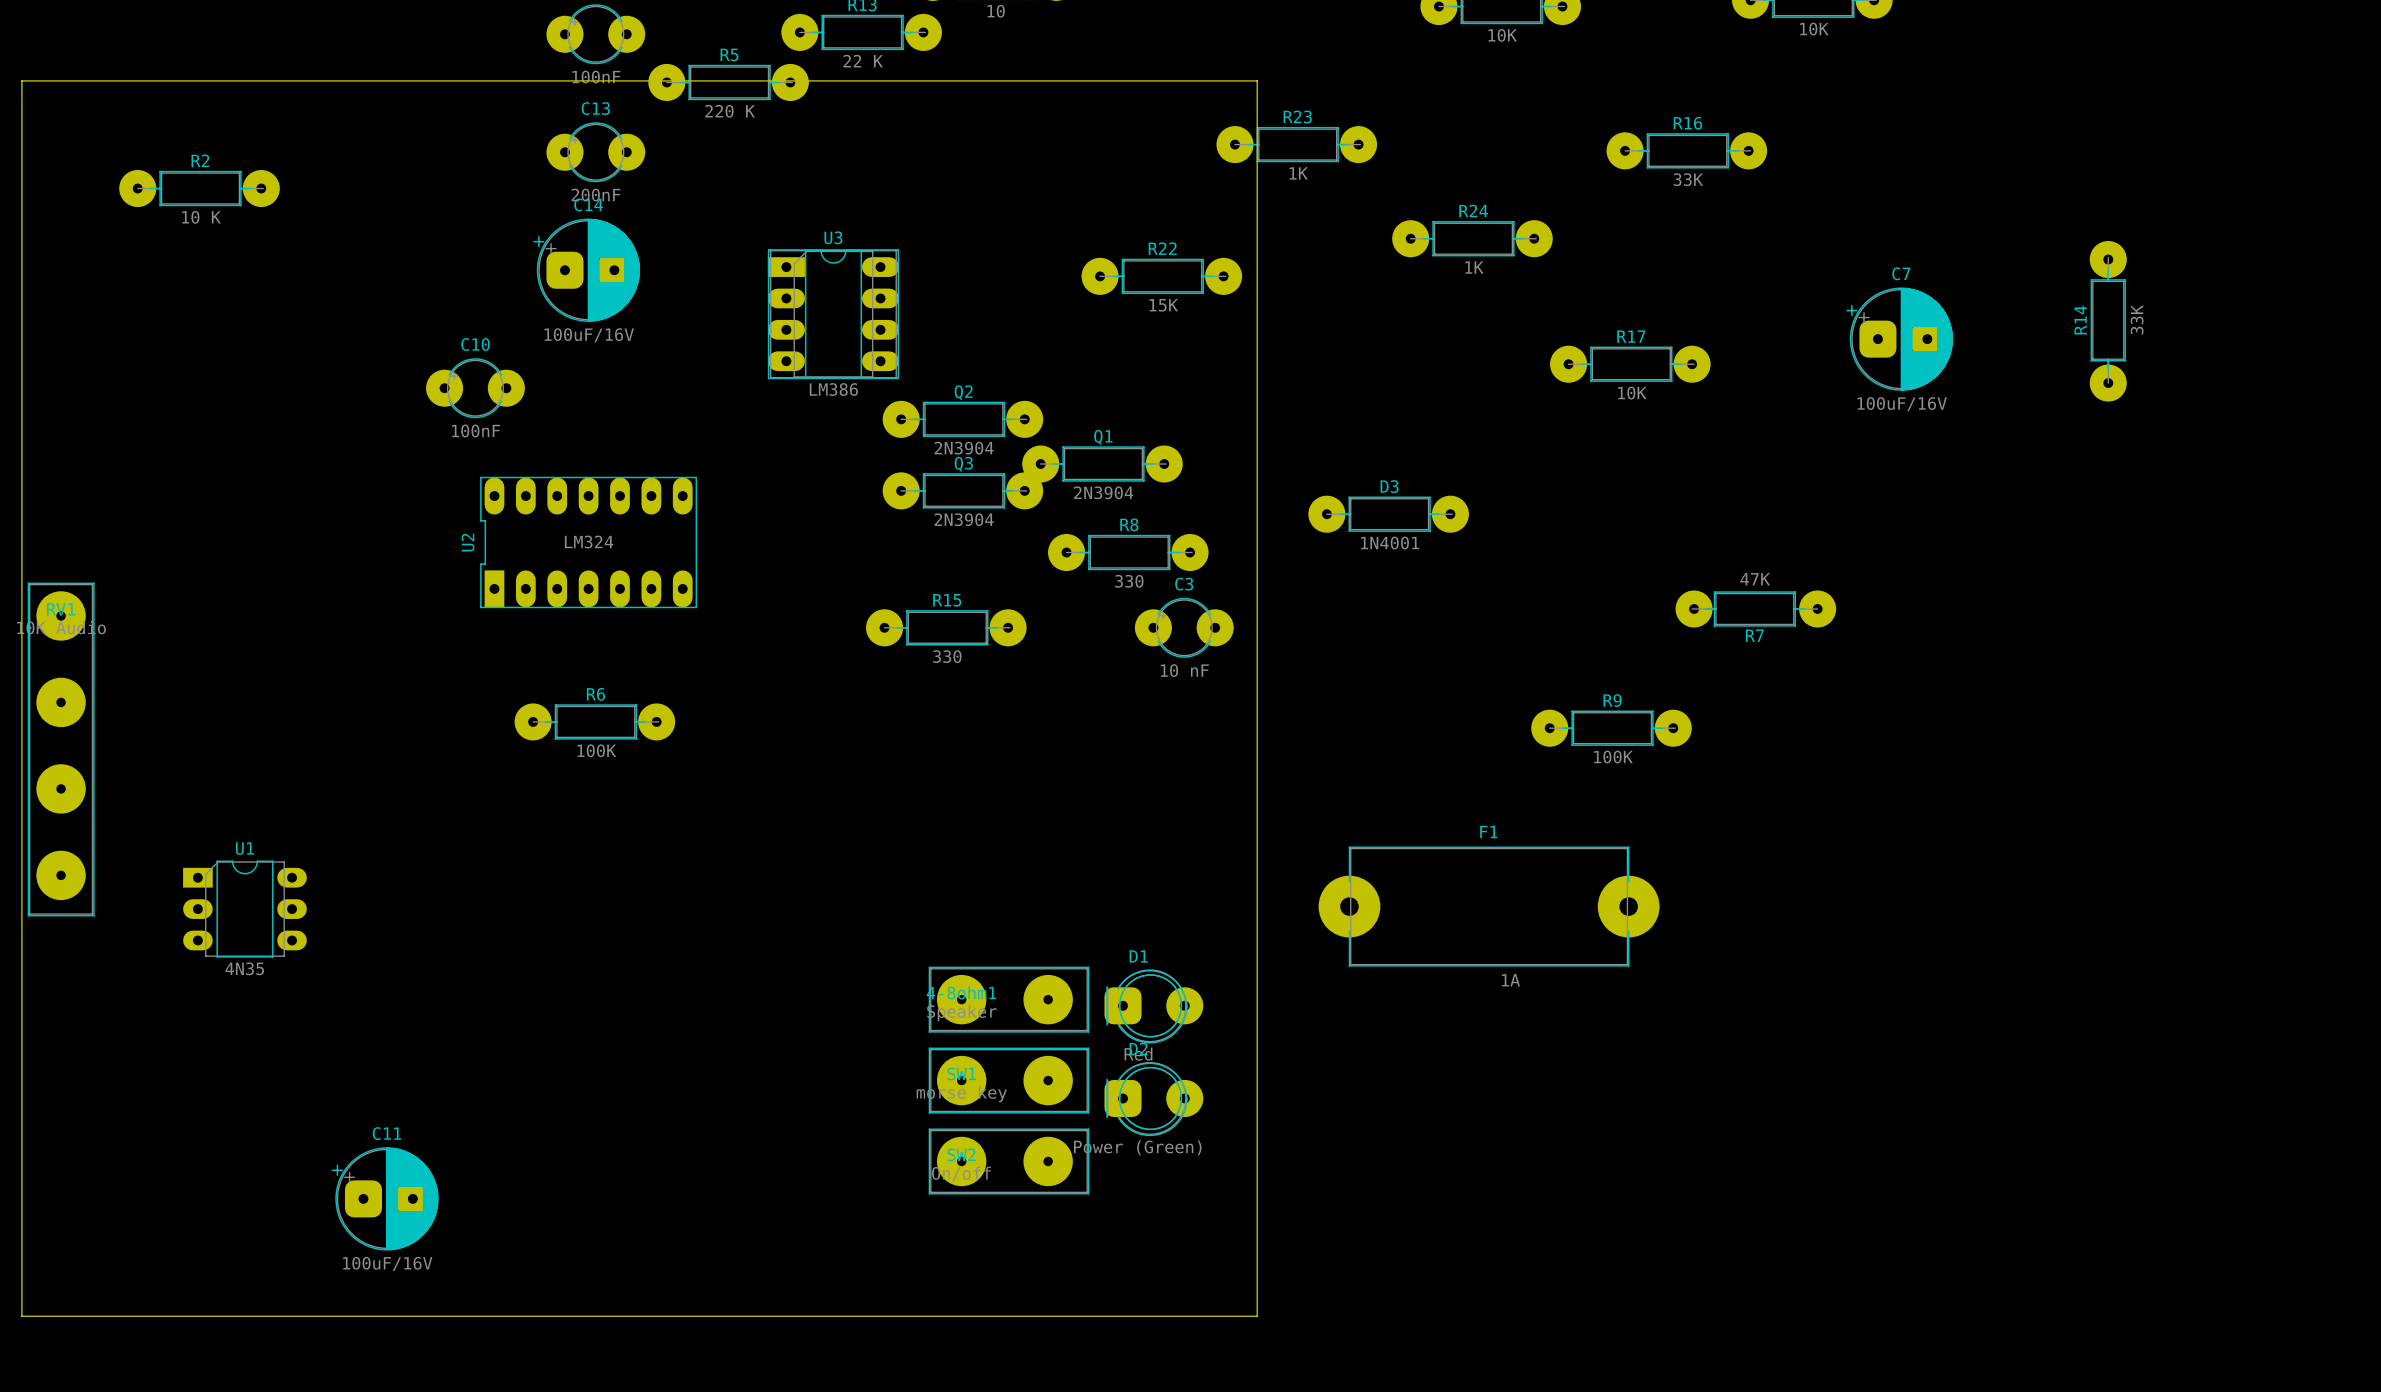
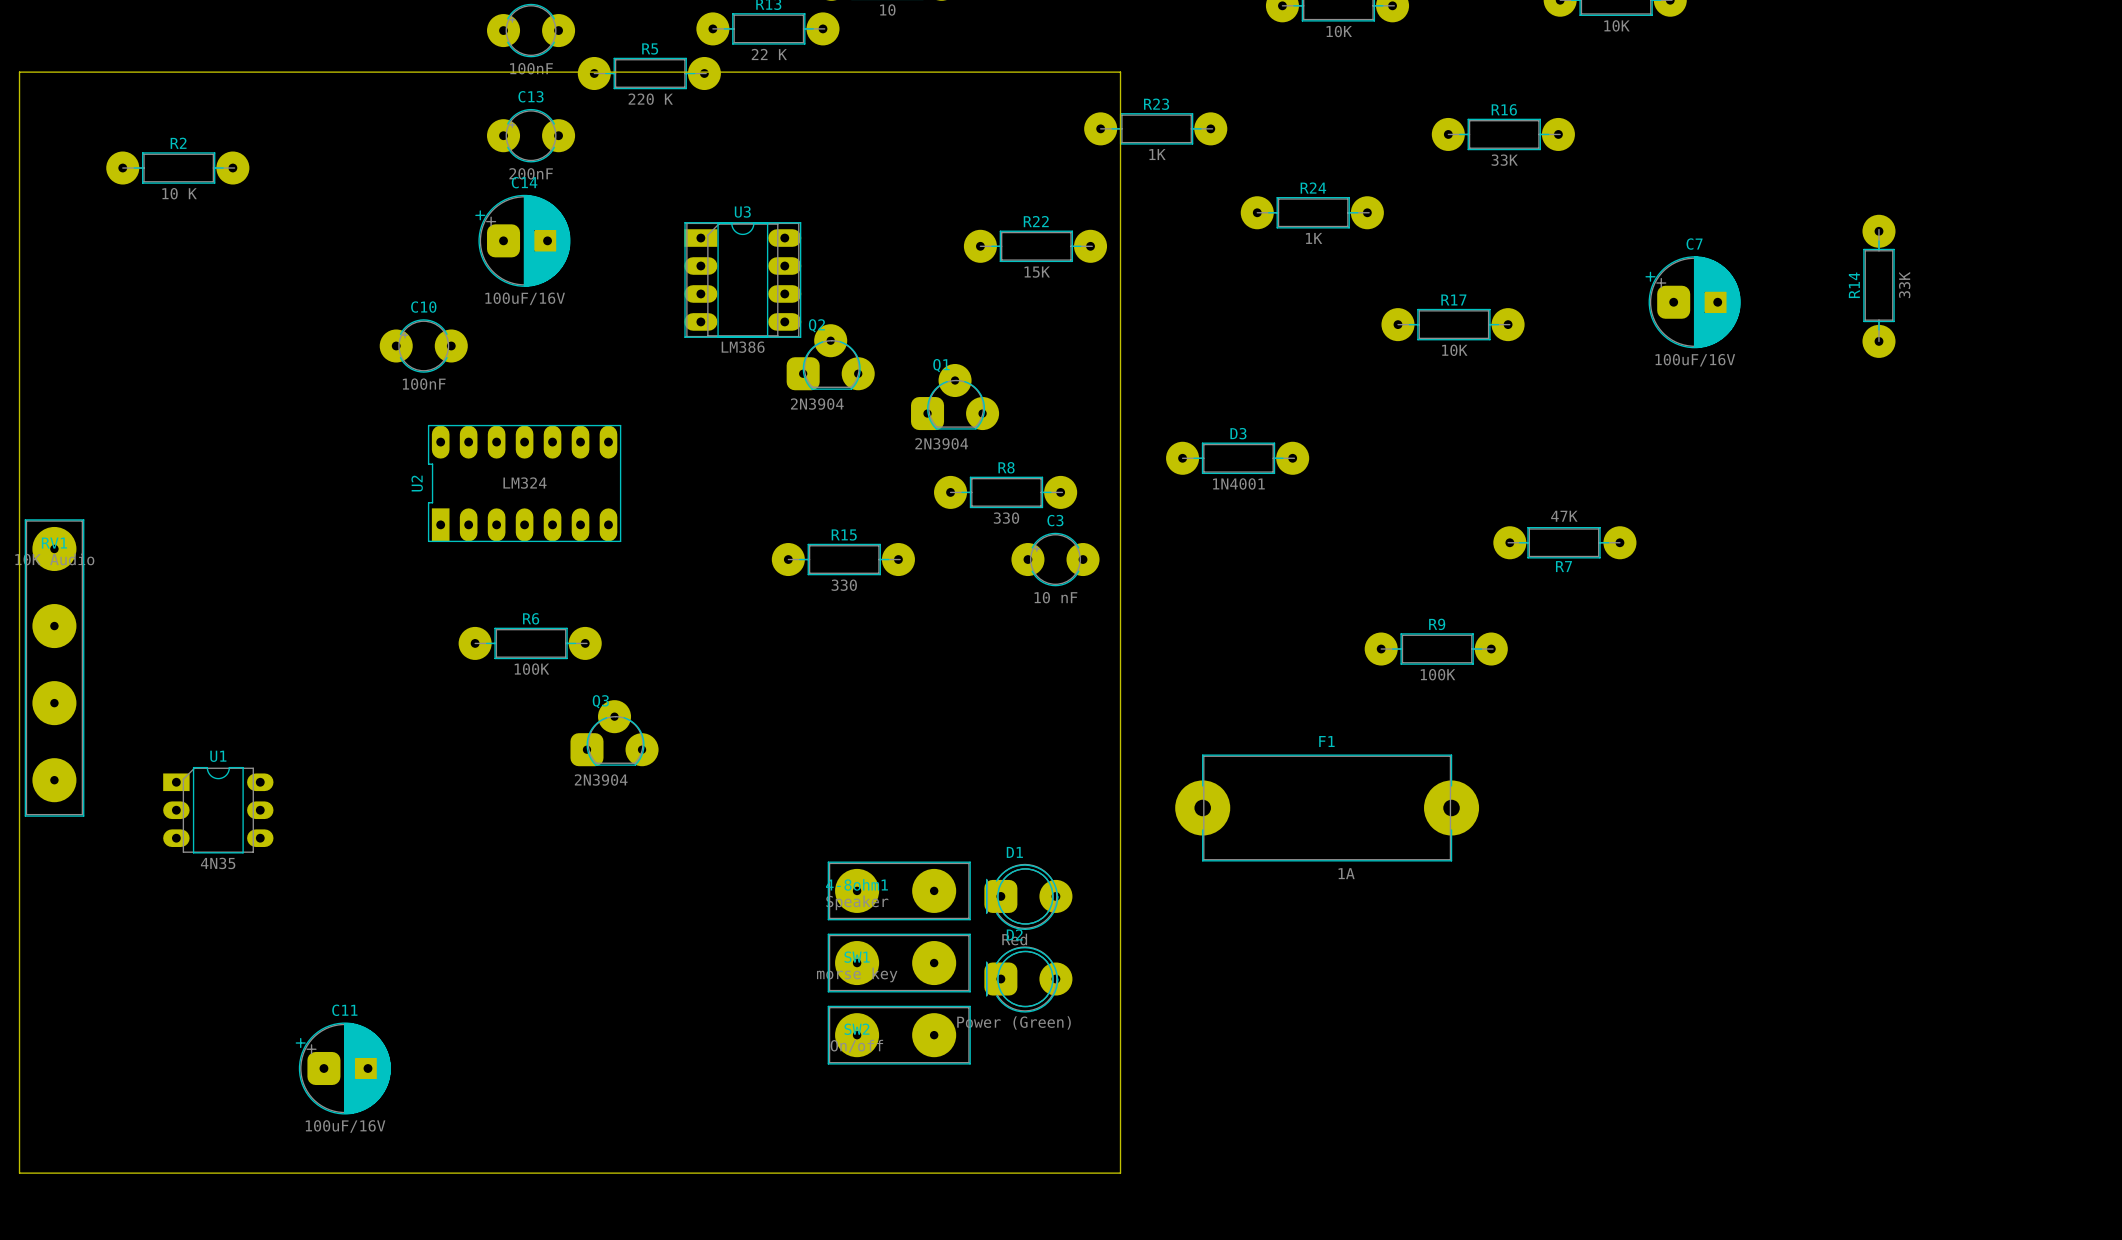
Q2 footprint: [882, 400, 1044, 438] -> [786, 324, 875, 391]
Q1 footprint: [1022, 445, 1183, 483] -> [911, 363, 1000, 431]
Q2 value position: 2N3904 (964, 448) -> 2N3904 (817, 404)
Q3 footprint: [882, 472, 1044, 510] -> [570, 700, 659, 767]
Q1 value position: 2N3904 (1103, 492) -> 2N3904 (941, 443)
Q3 value position: 2N3904 (964, 519) -> 2N3904 (601, 780)

